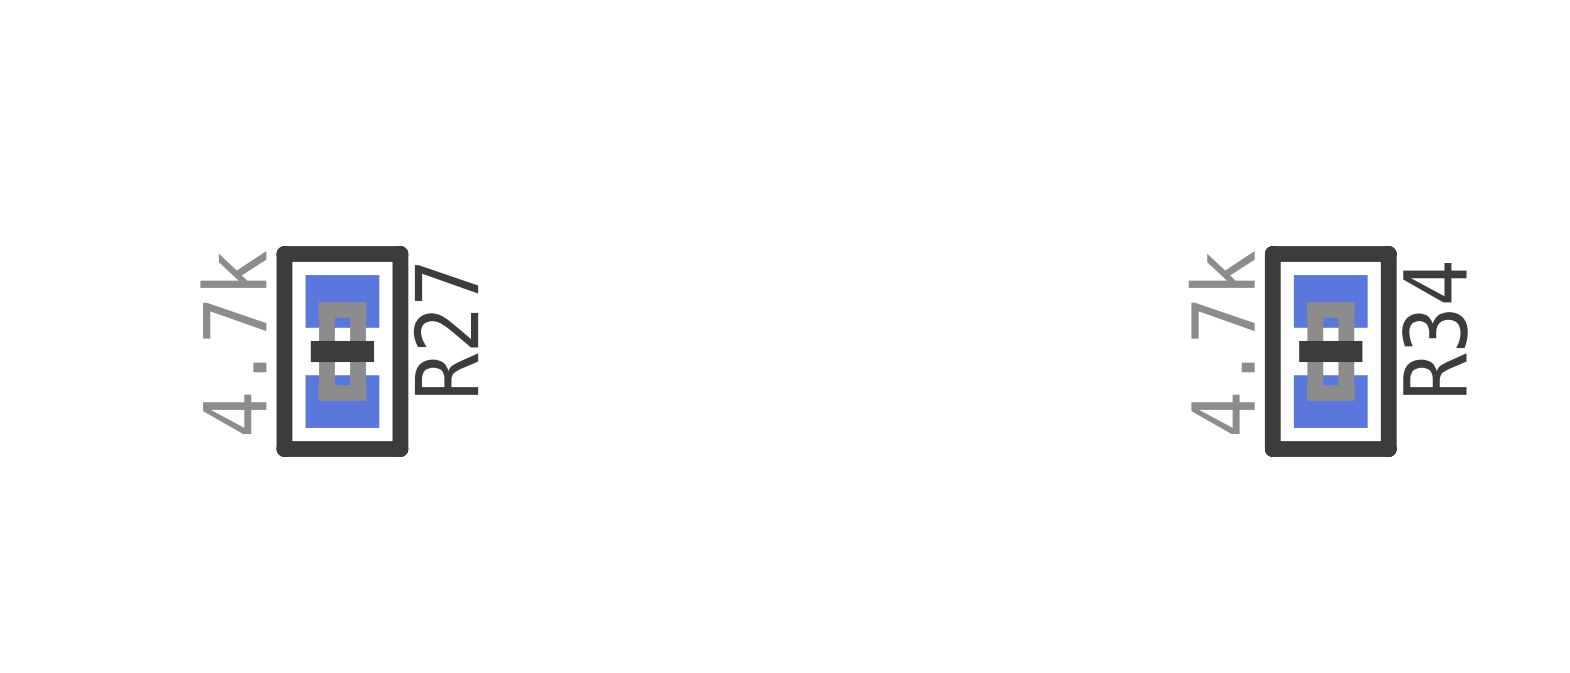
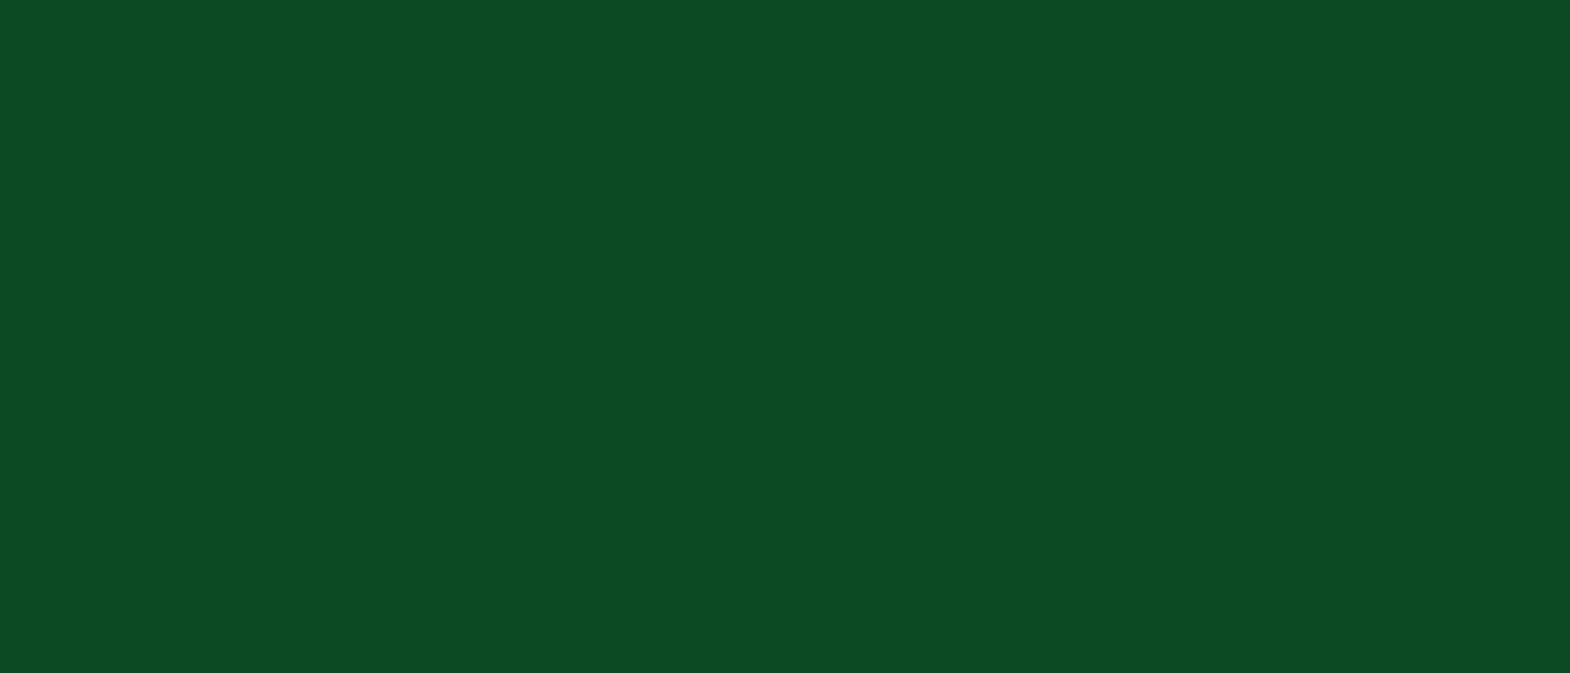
R27: 4.7k (342, 351) -> none
R34: 4.7k (1330, 351) -> none

